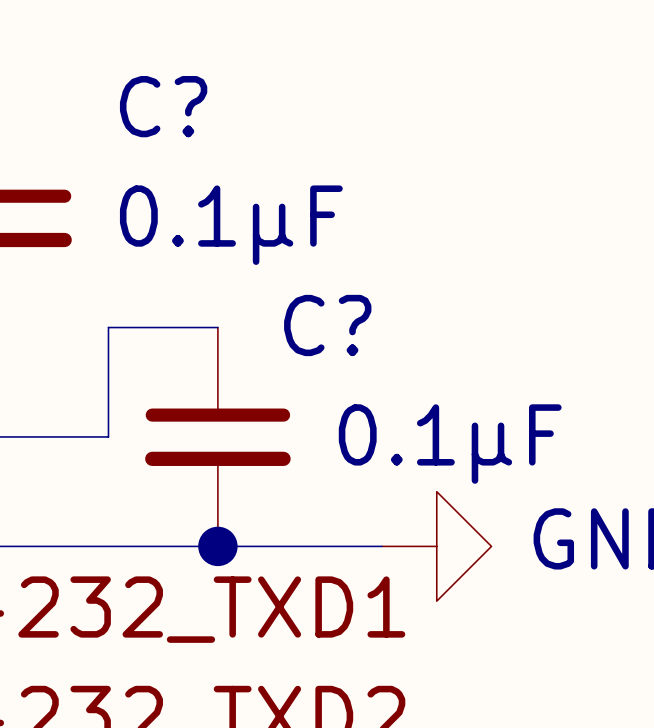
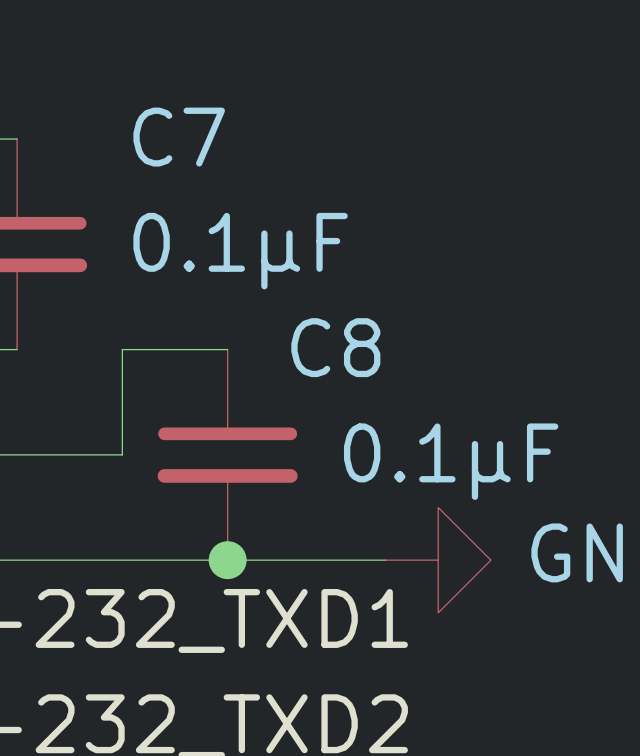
C? name: C? (163, 106) -> C7 (179, 137)
C? name: C? (327, 325) -> C8 (335, 347)

